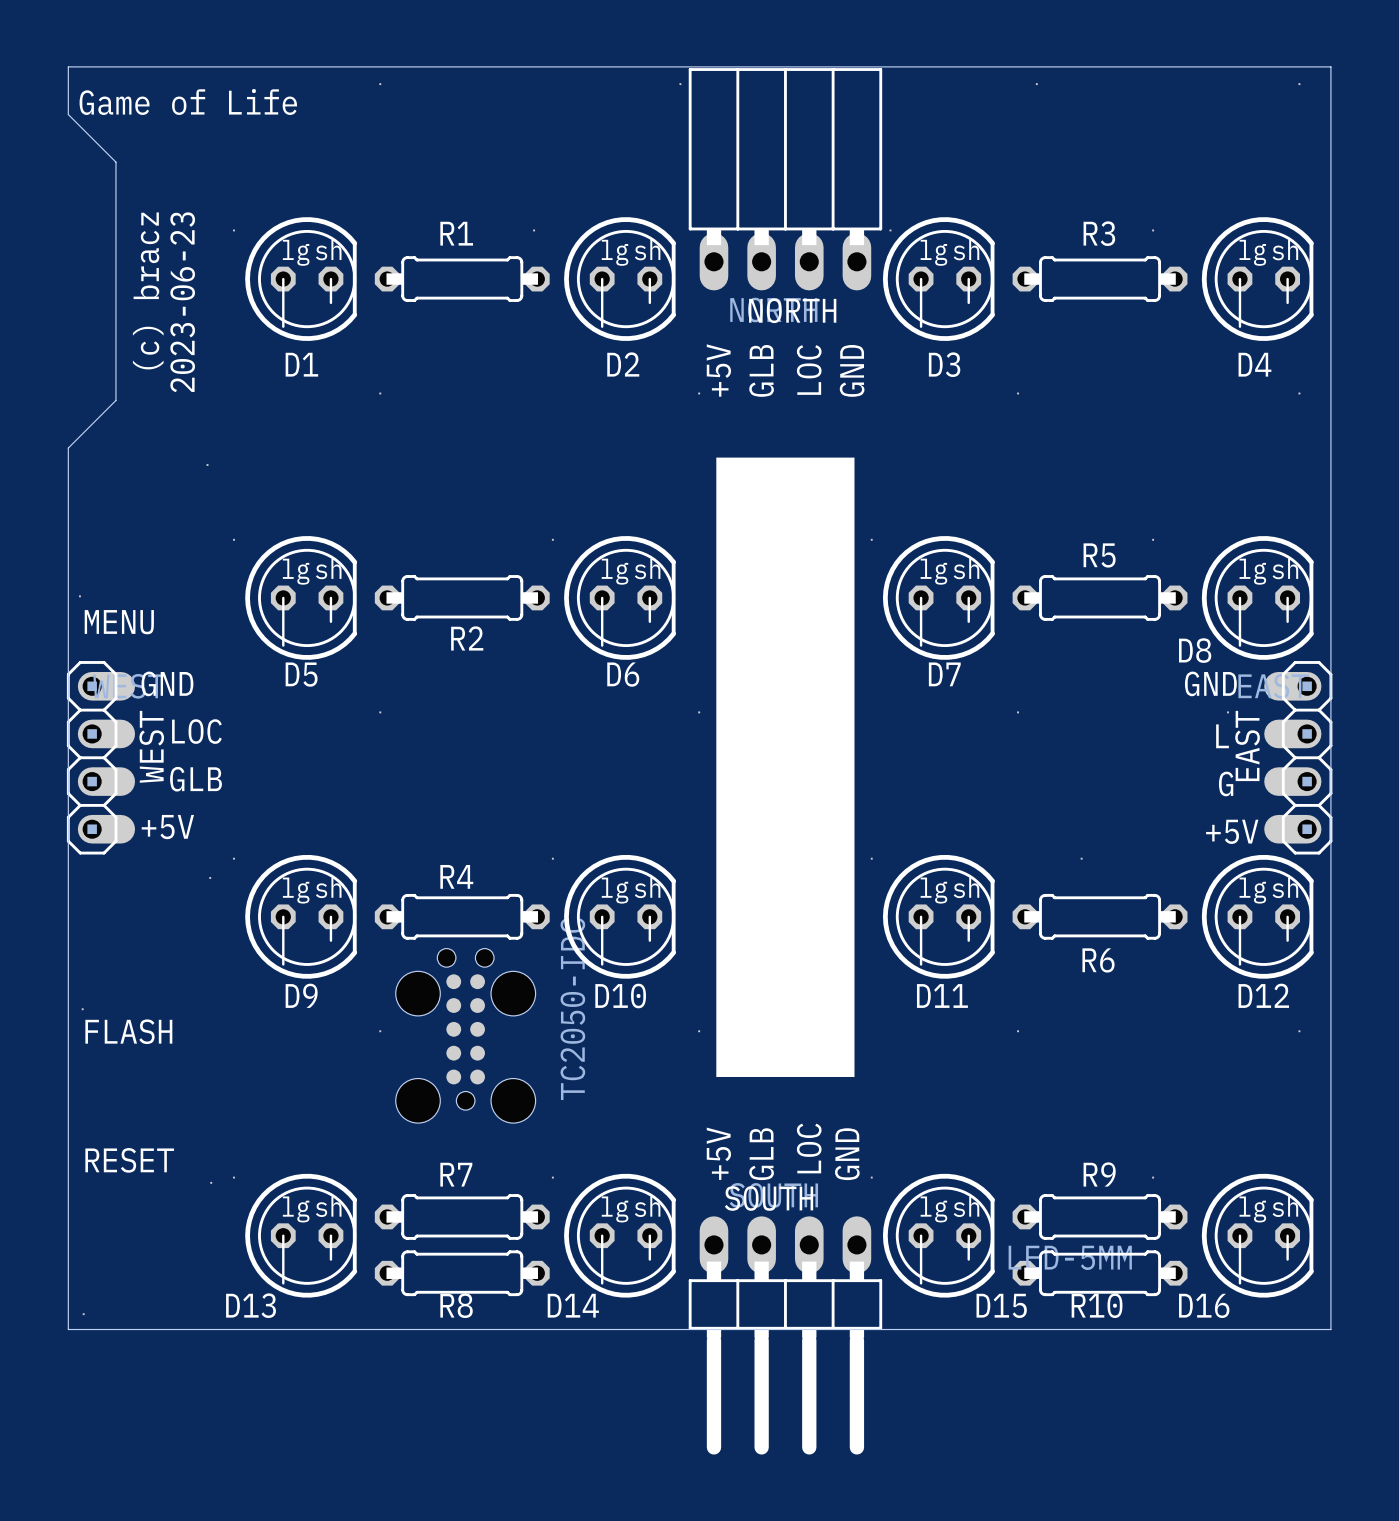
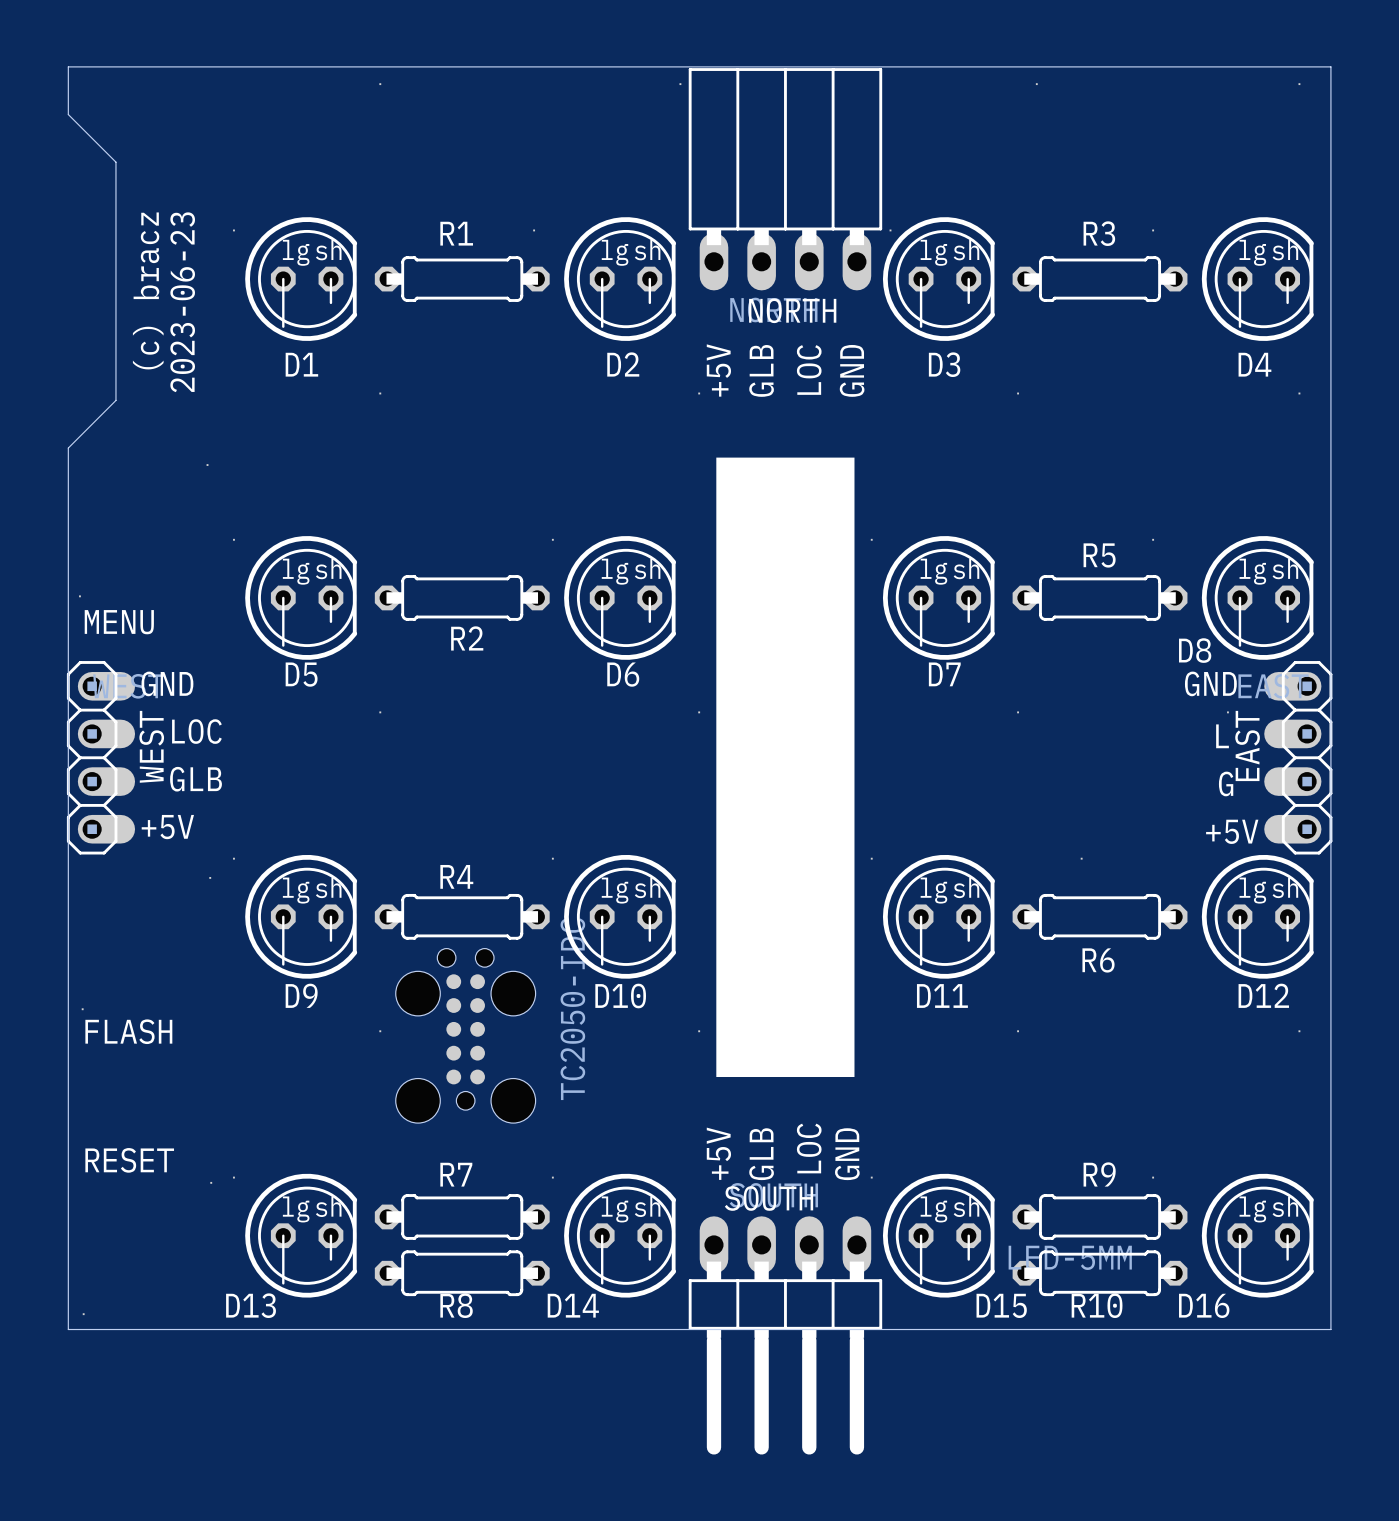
text: Game of Life (188, 101) -> none

